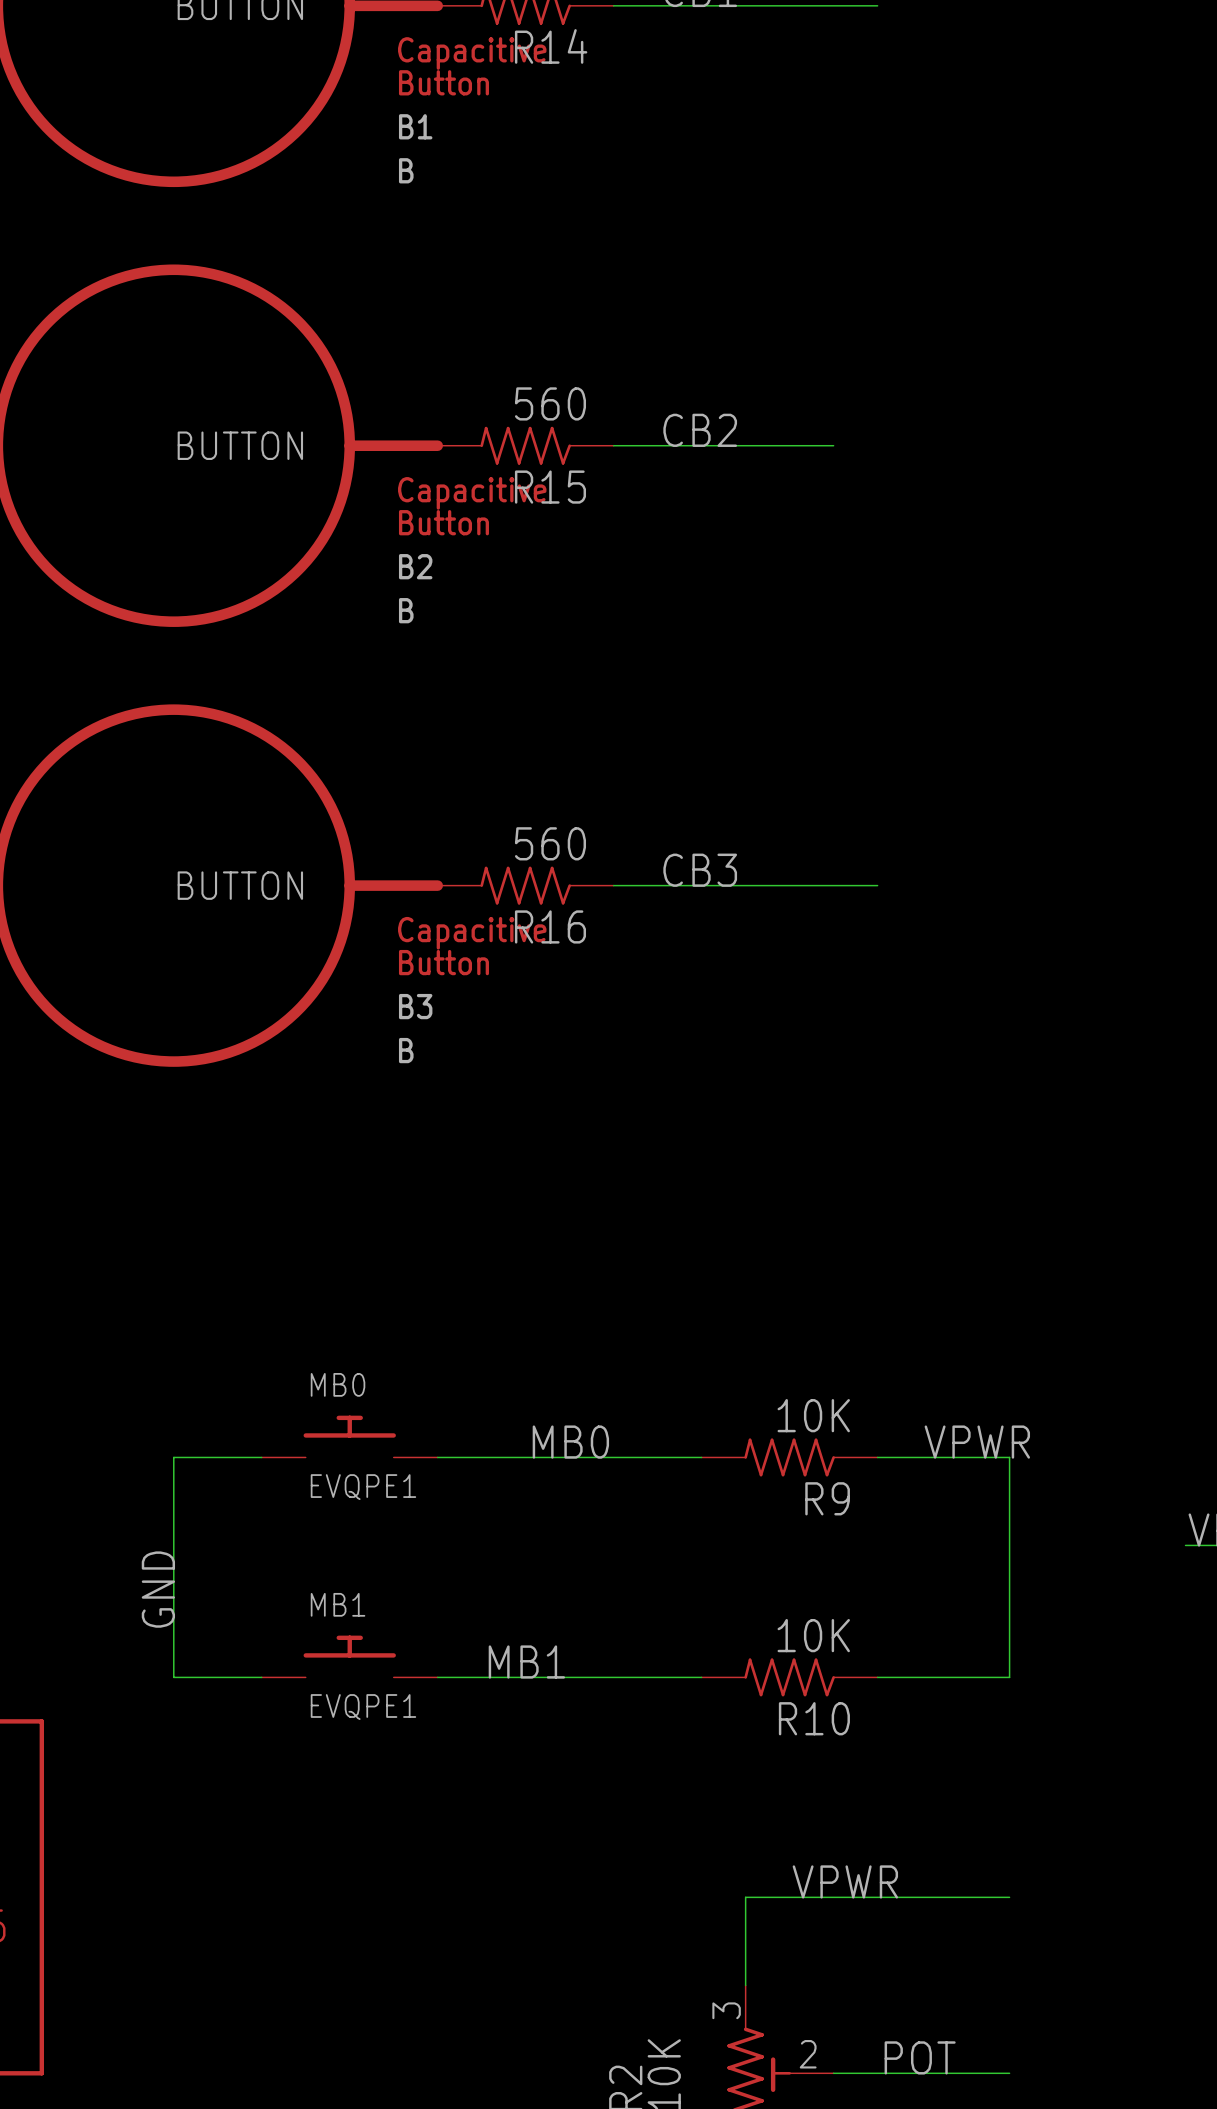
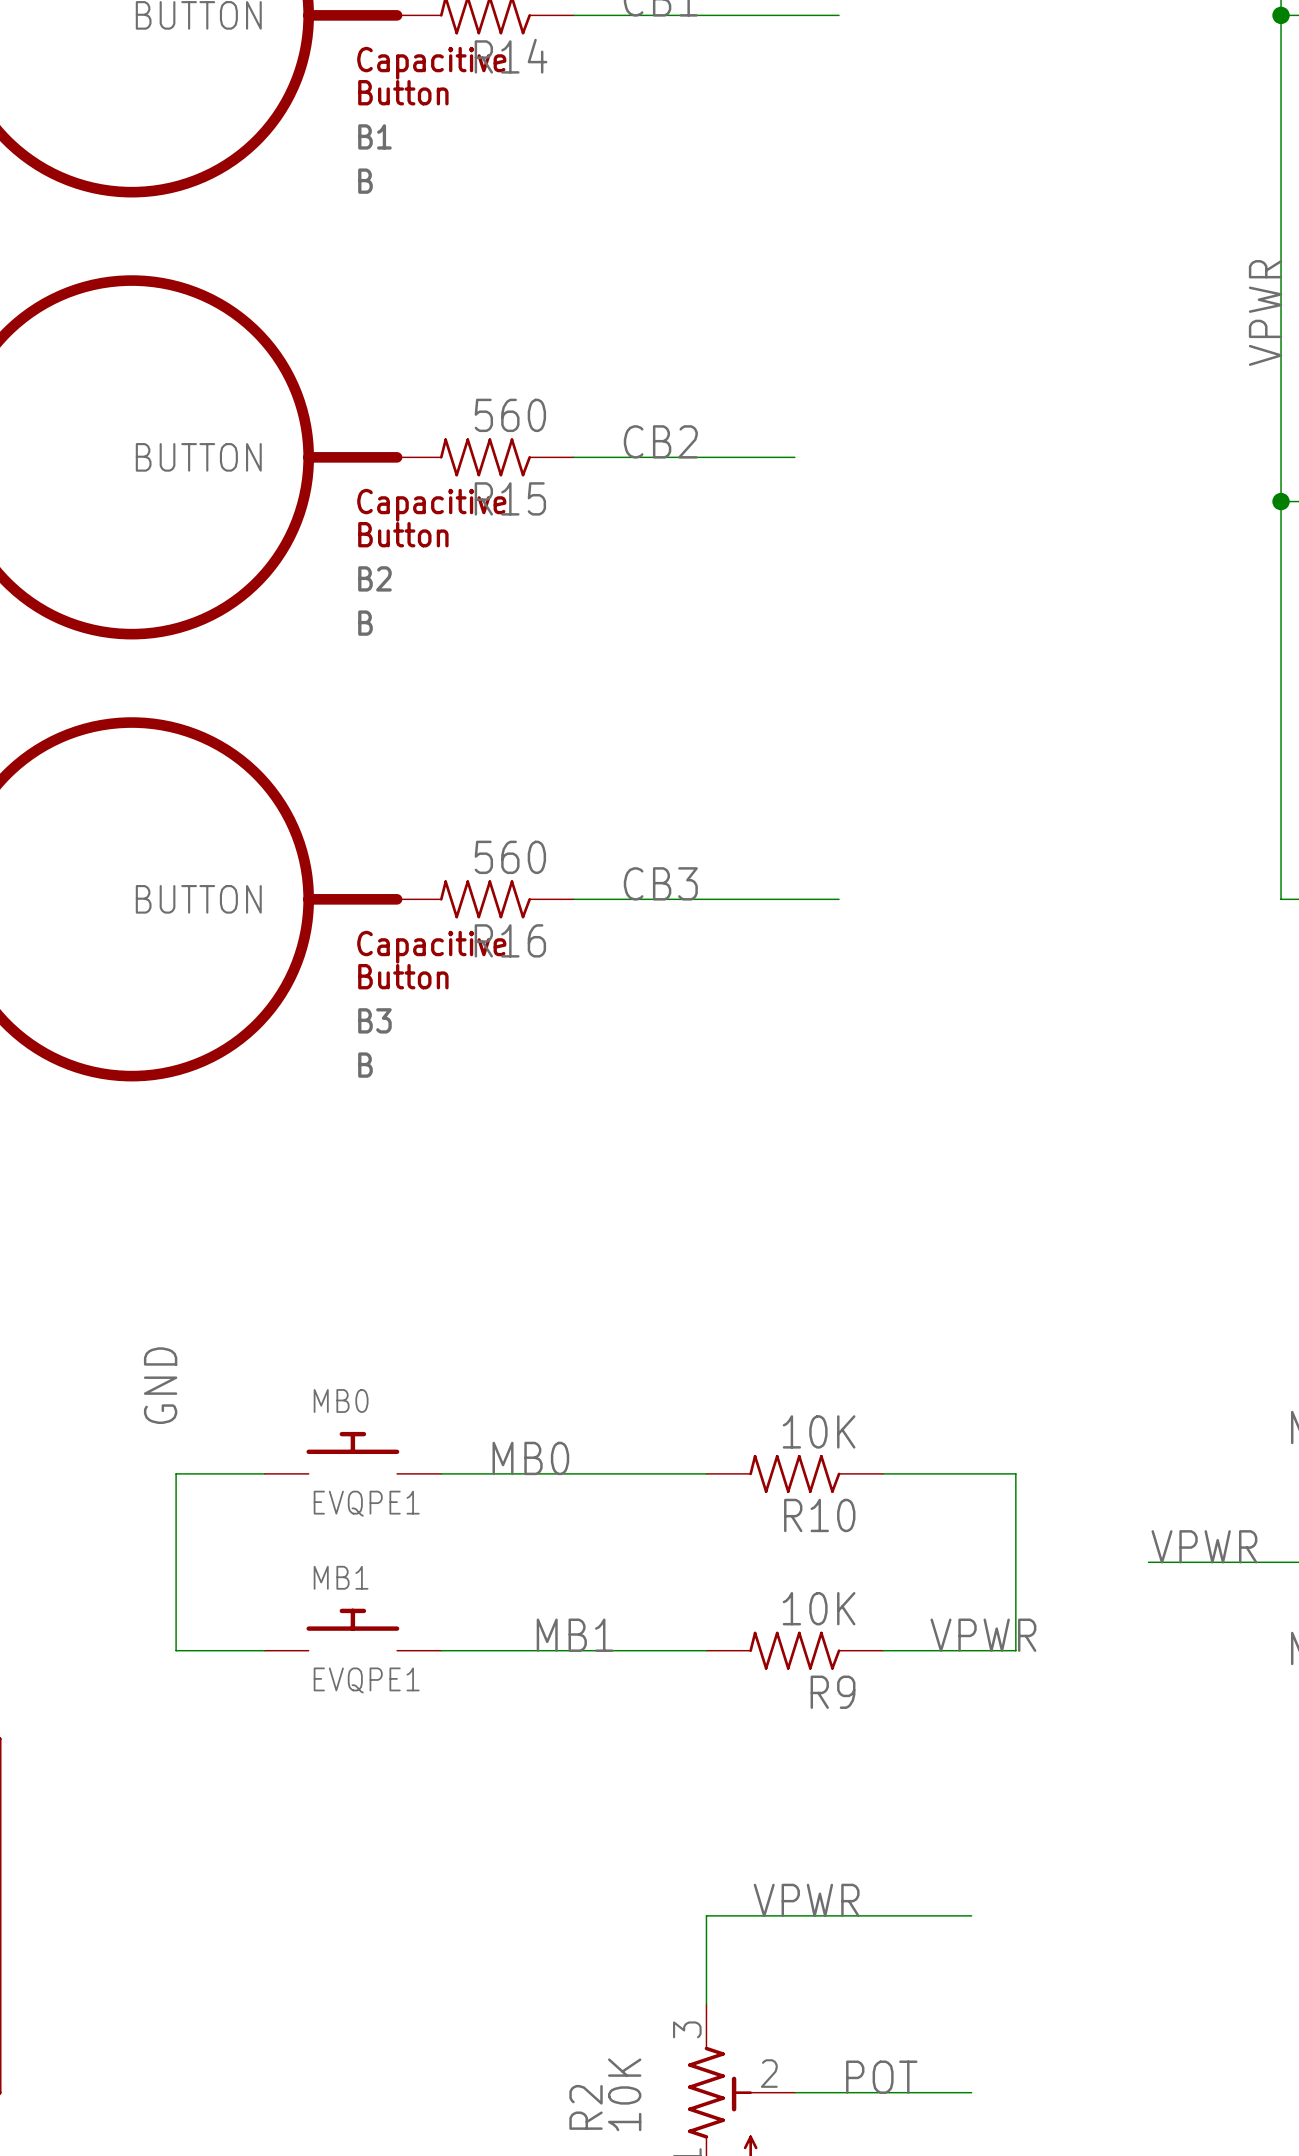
MB0 position: (349, 1436) -> (352, 1452)
label position: VPWR (977, 1442) -> VPWR (983, 1635)
wire: (217, 1457) (173, 1457) (173, 1677) (261, 1677) -> (176, 1473) (176, 1650) (264, 1650)
R9 position: (789, 1457) -> (794, 1650)
wire: (1009, 1457) (1009, 1677) (877, 1677) -> (971, 1473) (1015, 1473) (1015, 1650) (883, 1650)
label position: GND (158, 1589) -> GND (160, 1385)
MB1 position: (349, 1656) -> (352, 1629)
label position: MB1 (526, 1662) -> MB1 (575, 1635)
wire: (437, 1677) (701, 1677) -> (441, 1650) (706, 1650)
R10 position: (789, 1677) -> (794, 1473)

